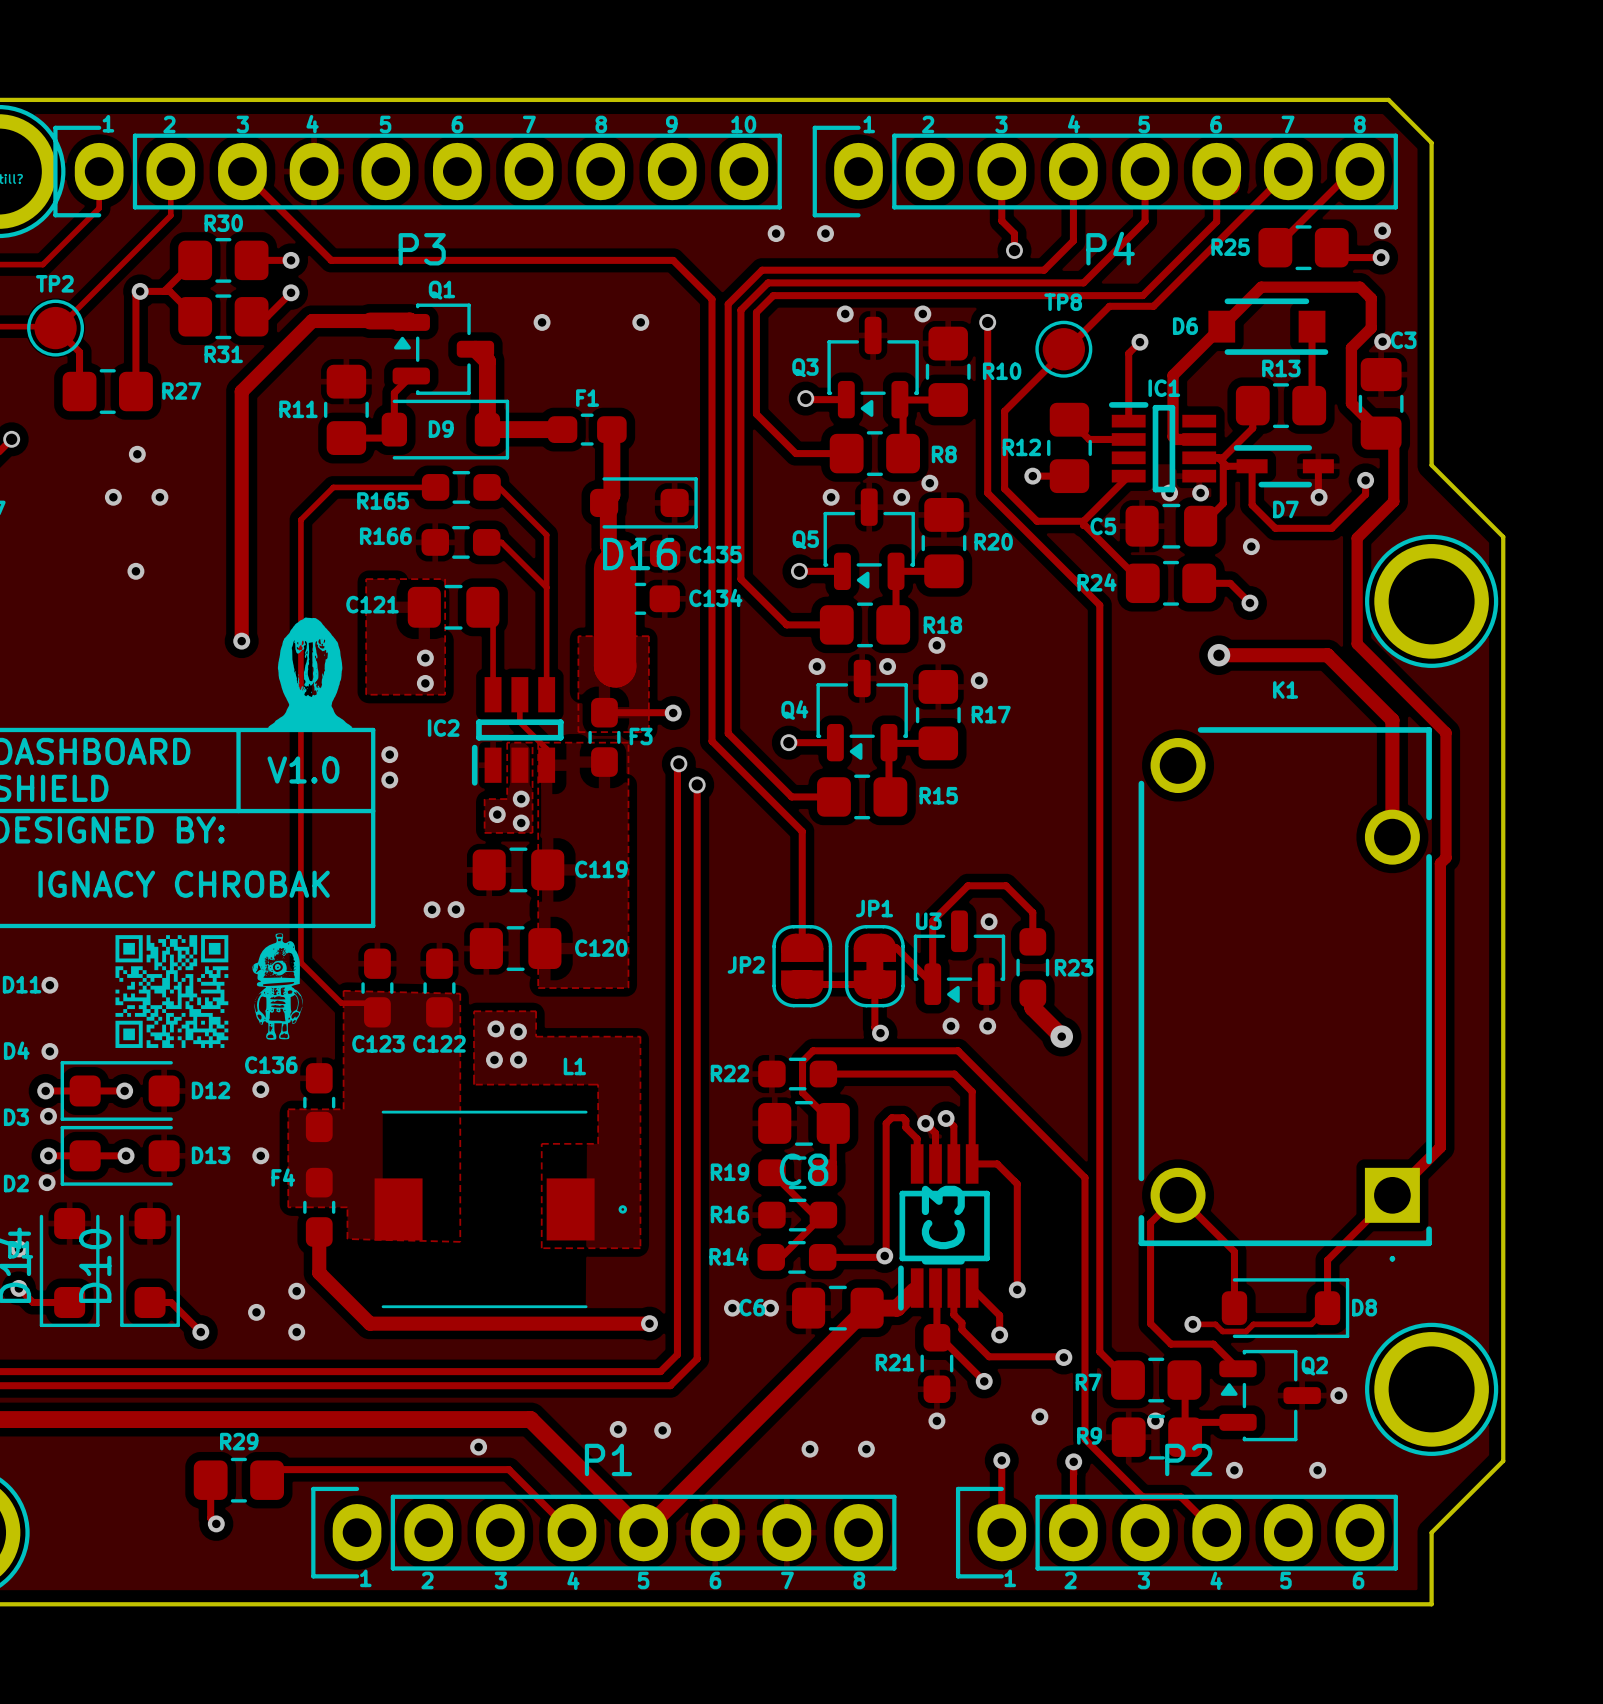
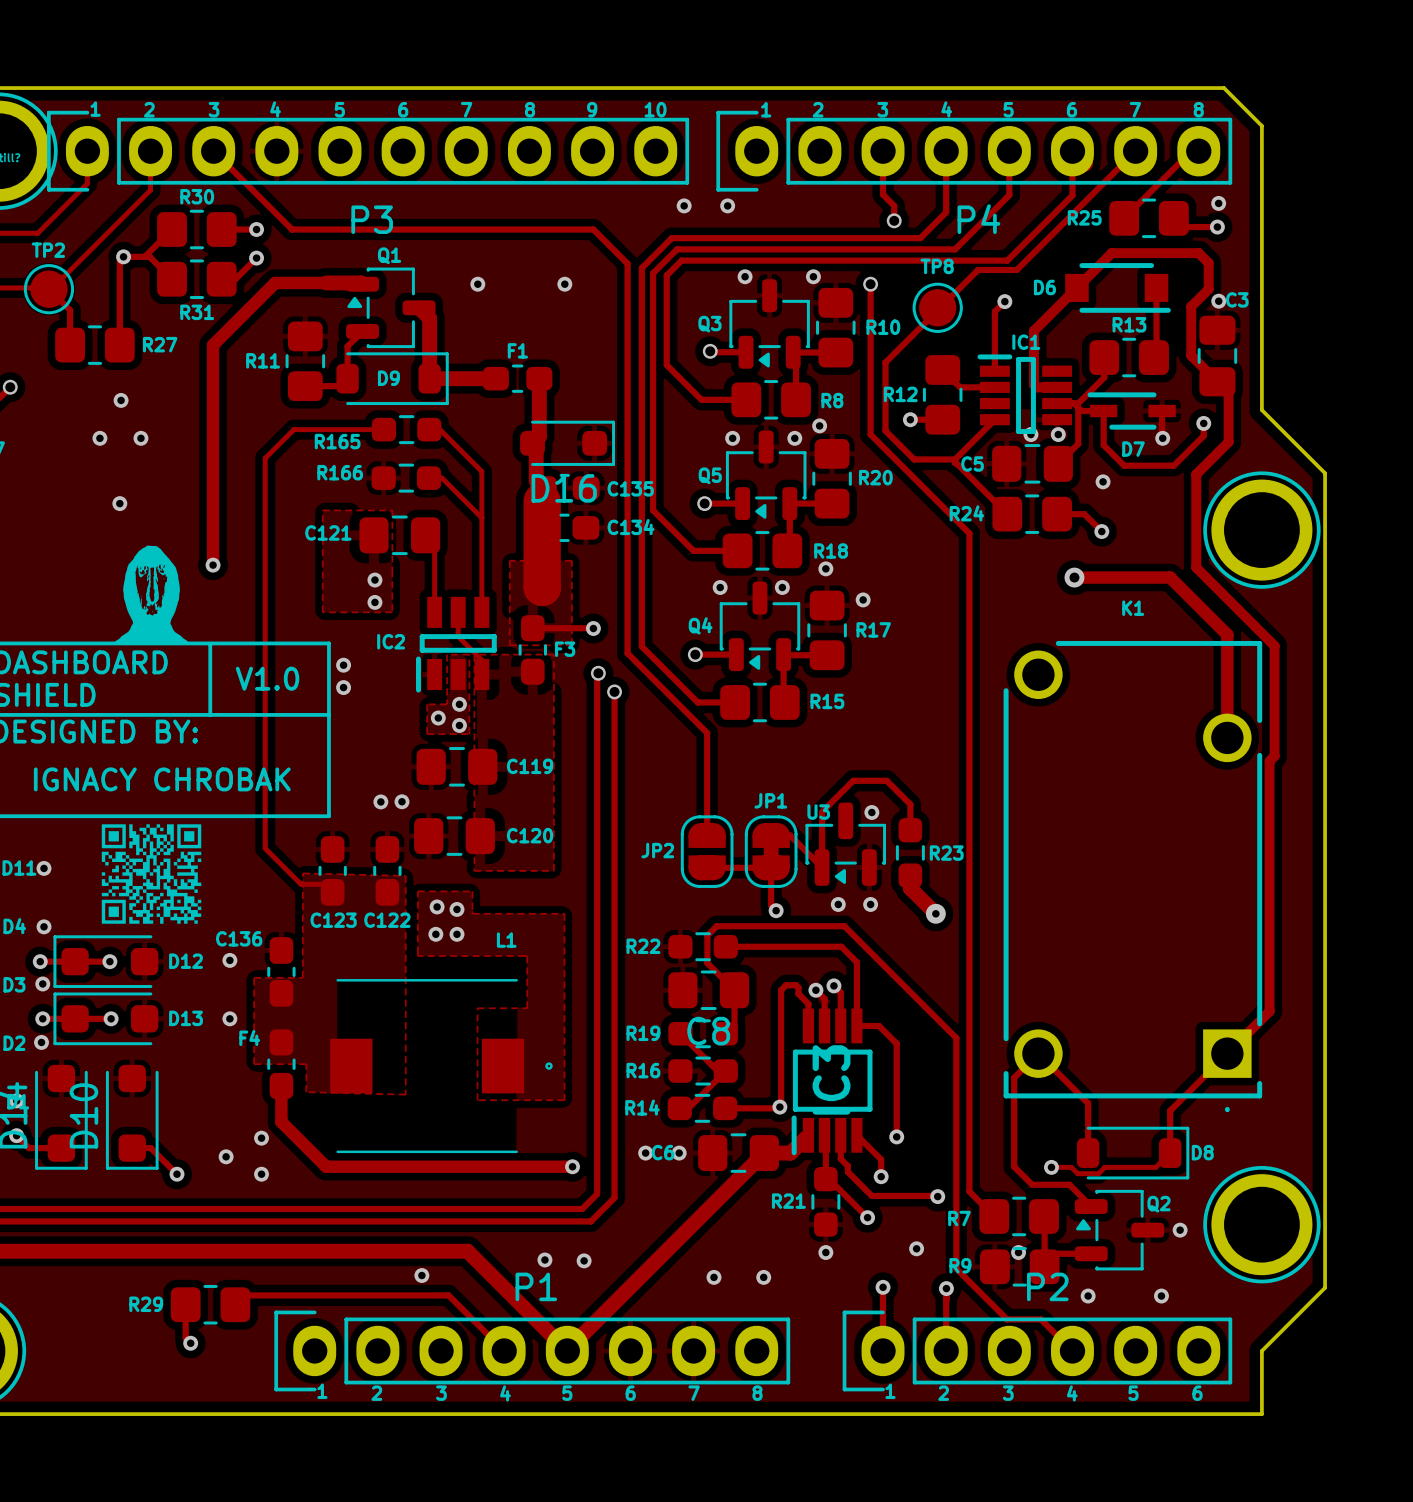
drawing position: (310, 672) -> (151, 594)
drawing: [252, 933, 303, 1040] -> none
R29 name position: R29 (239, 1441) -> R29 (146, 1304)

